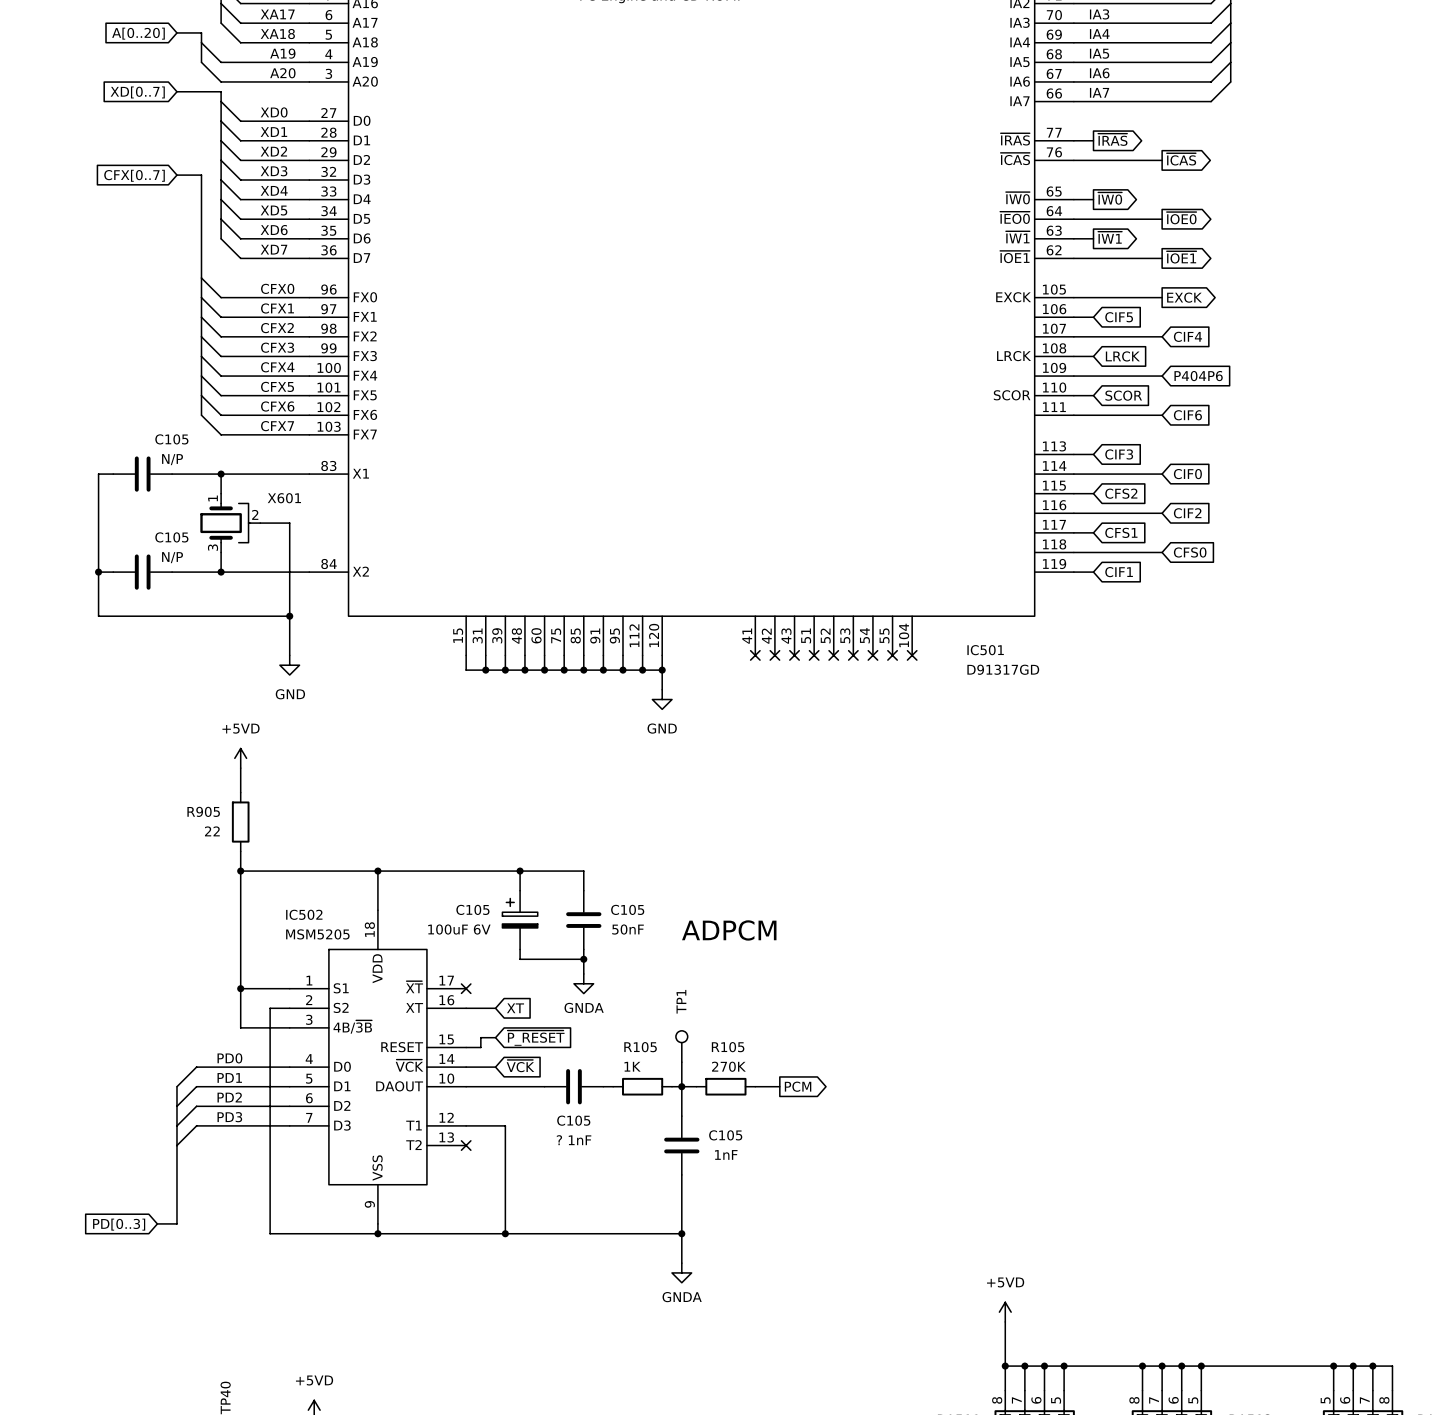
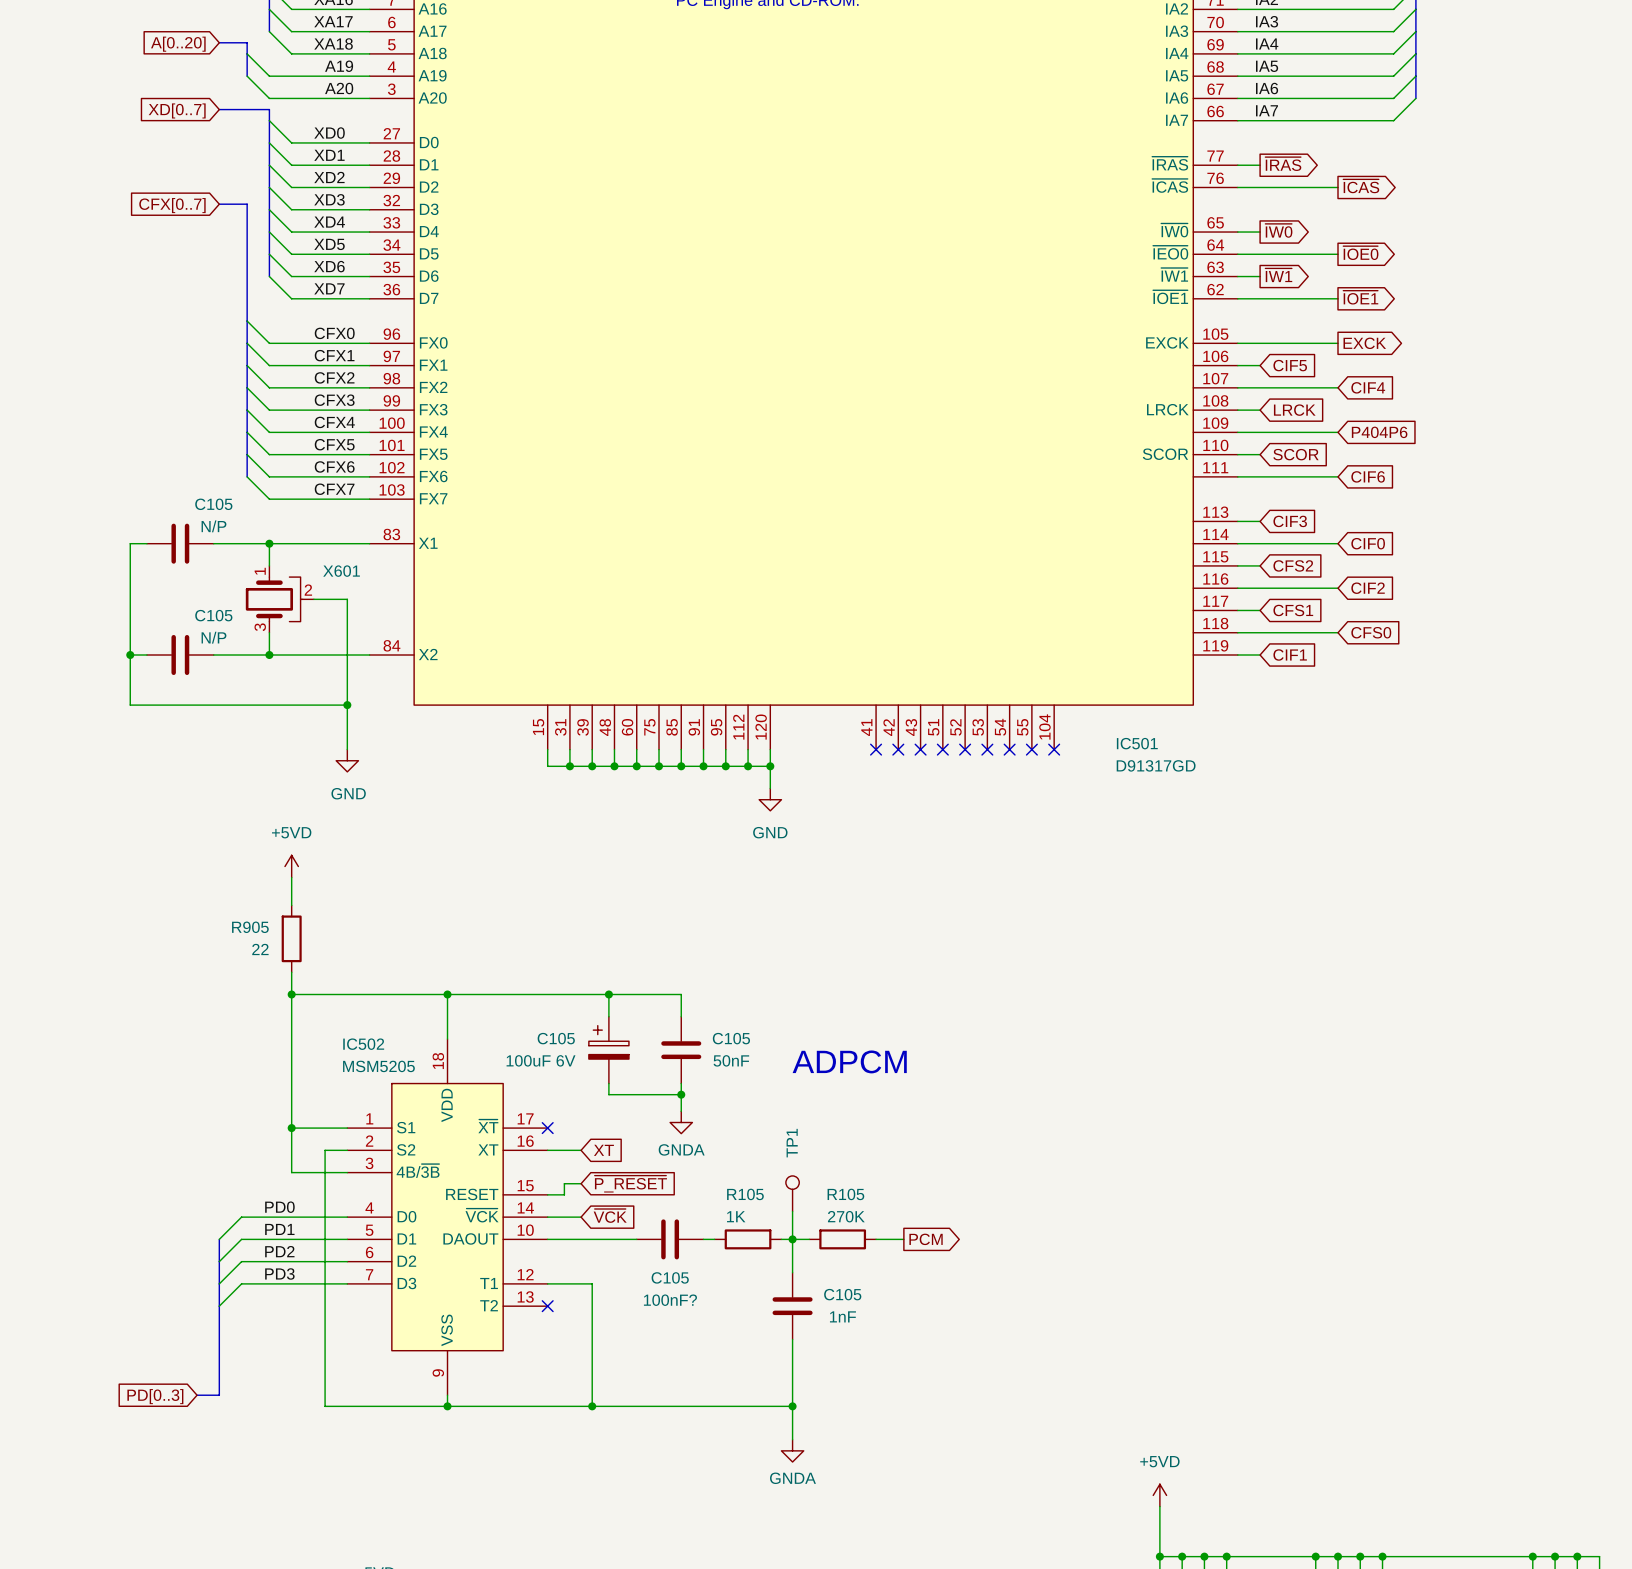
C105 value: ? 1nF (574, 1140) -> 100nF? (670, 1300)

